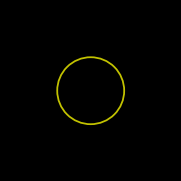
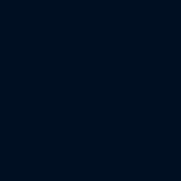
round board edge: [56, 56, 125, 125] -> none

